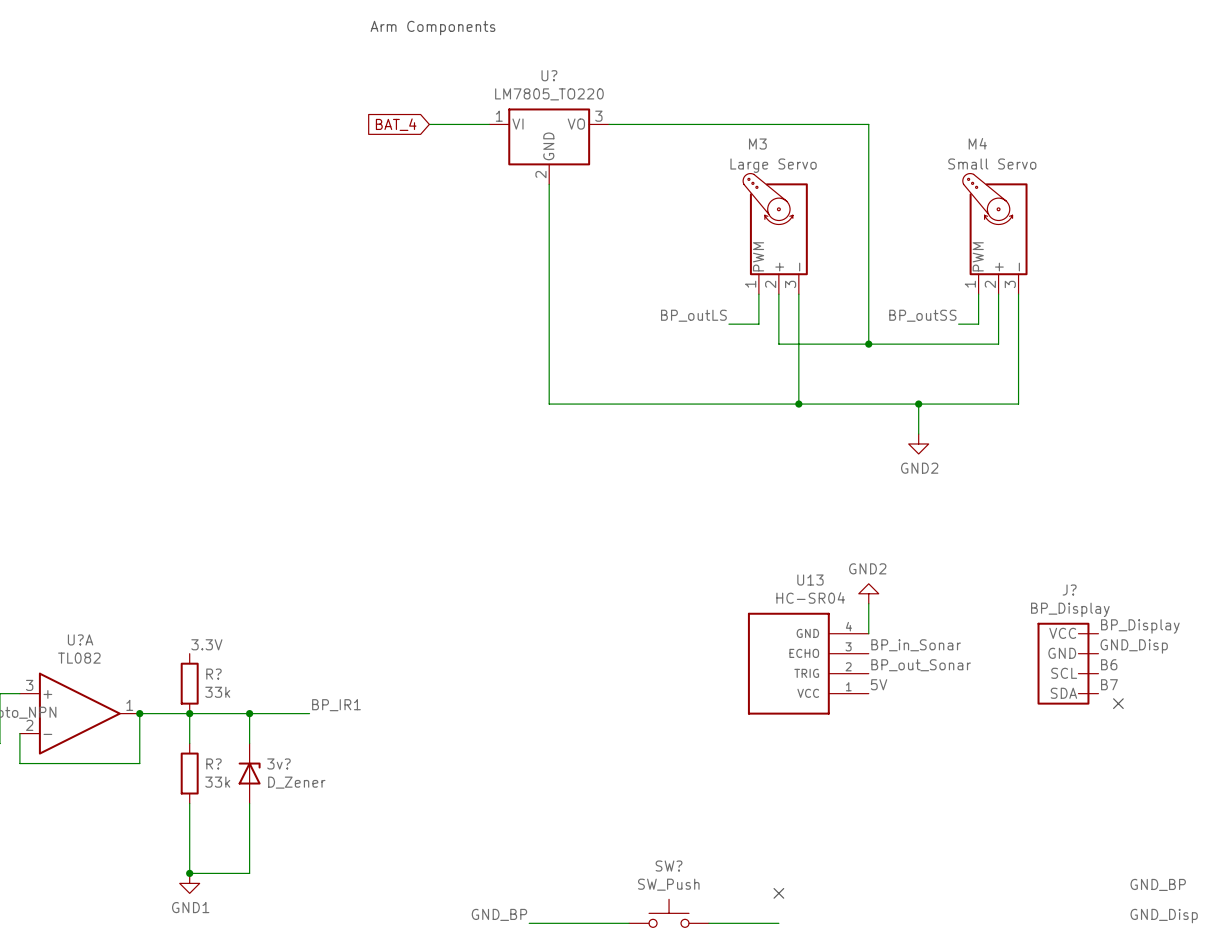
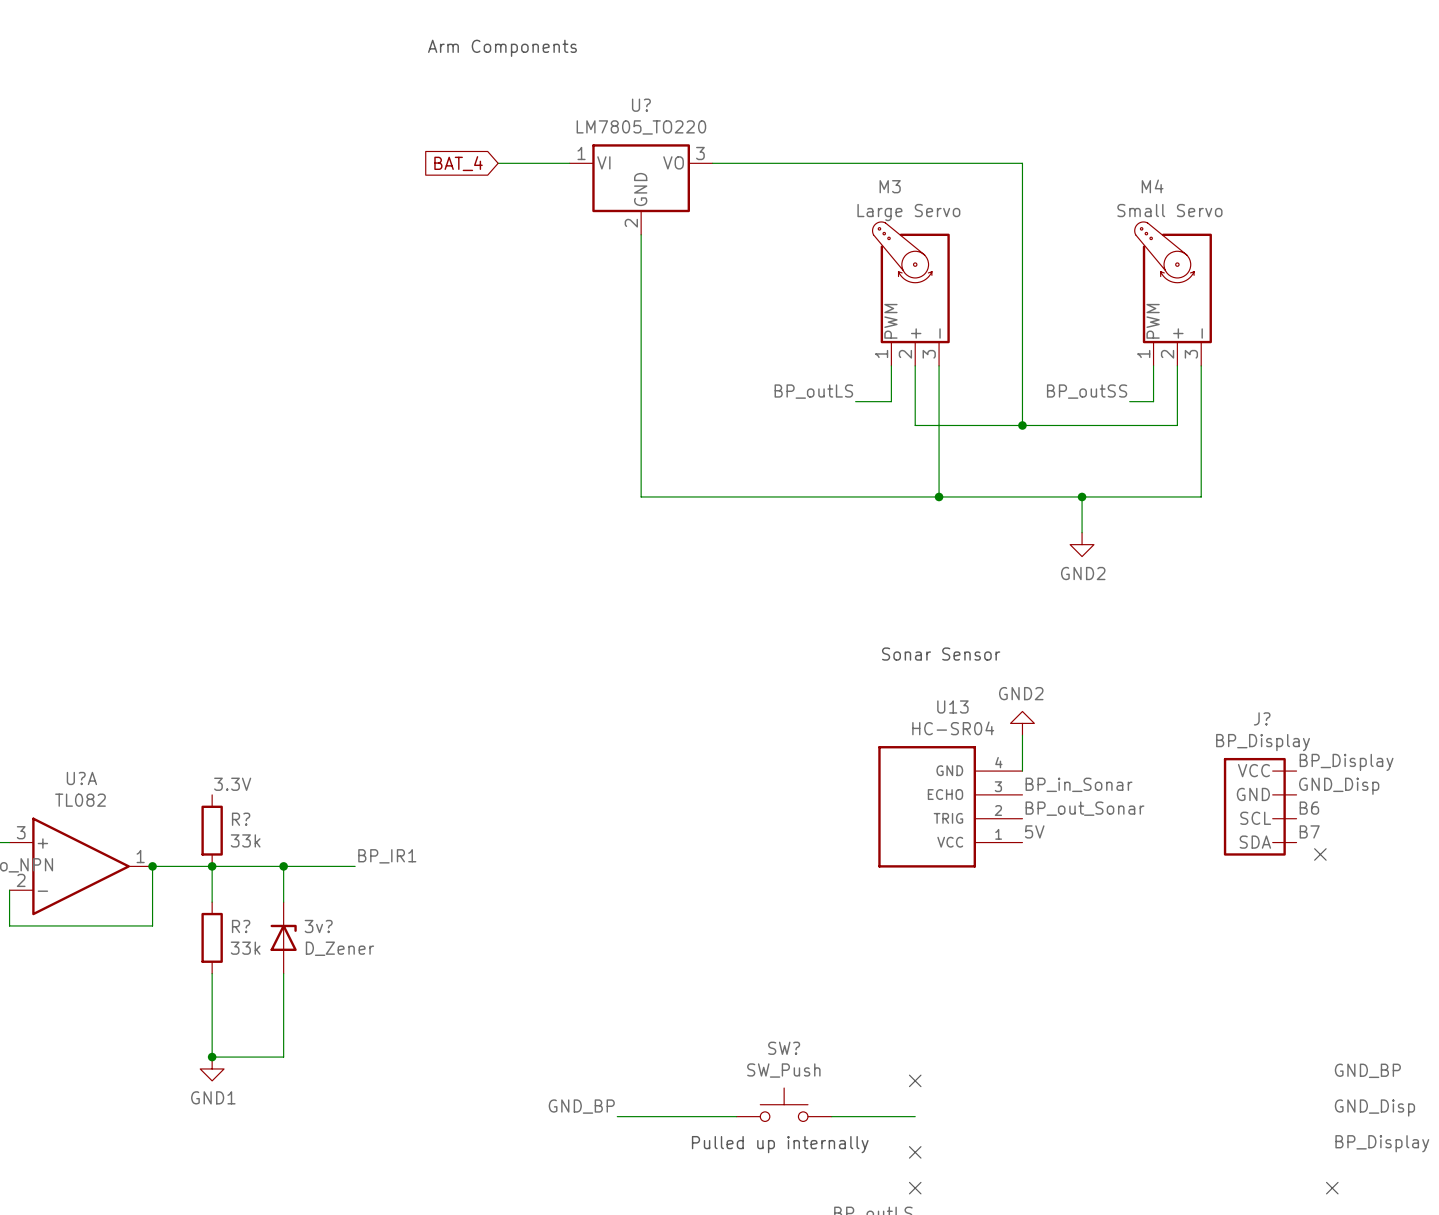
text: none -> Sonar Sensor (941, 654)

